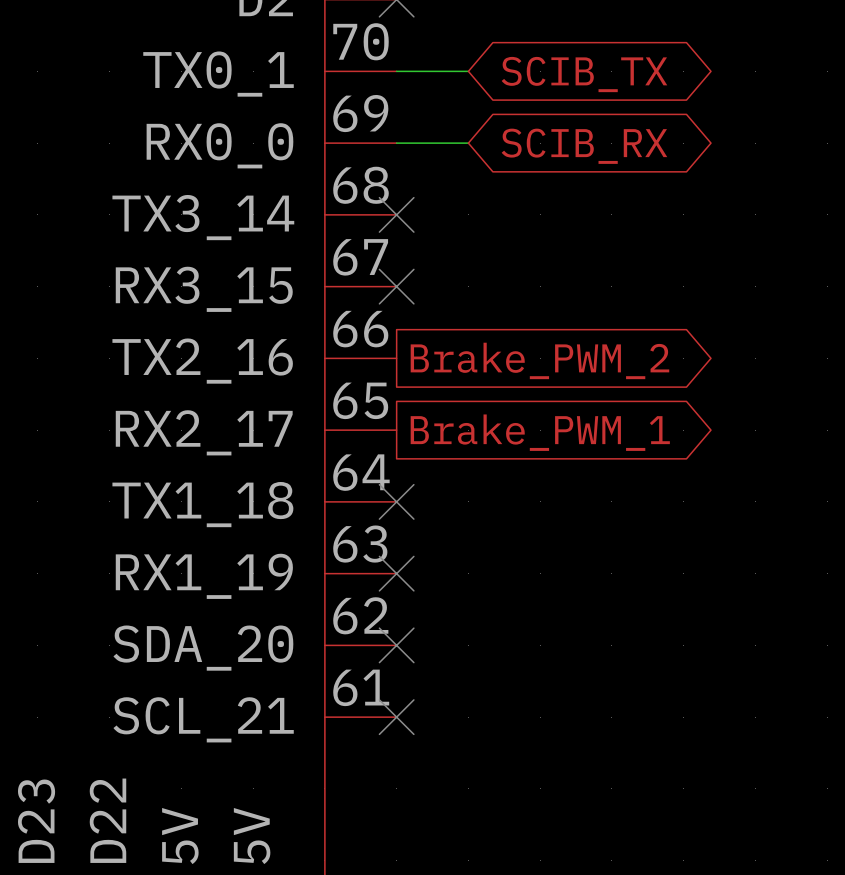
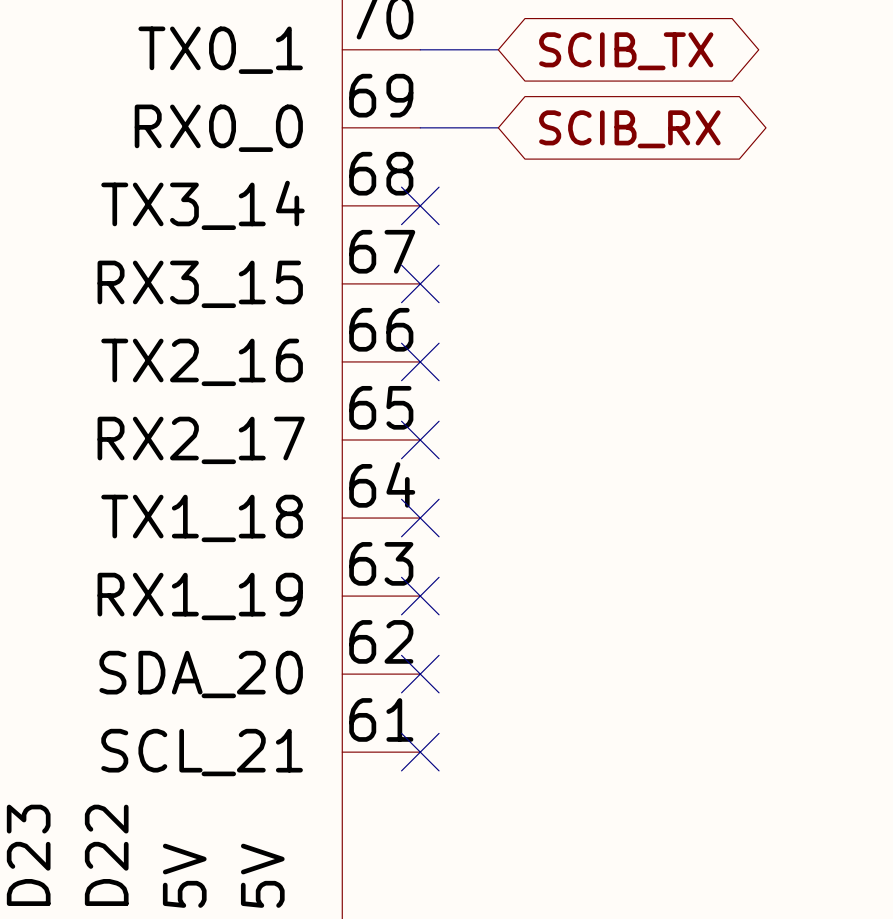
no-connect mark: none -> (420, 361)
global label: Brake_PWM_2 (539, 360) -> none
no-connect mark: none -> (420, 439)
global label: Brake_PWM_1 (540, 432) -> none

